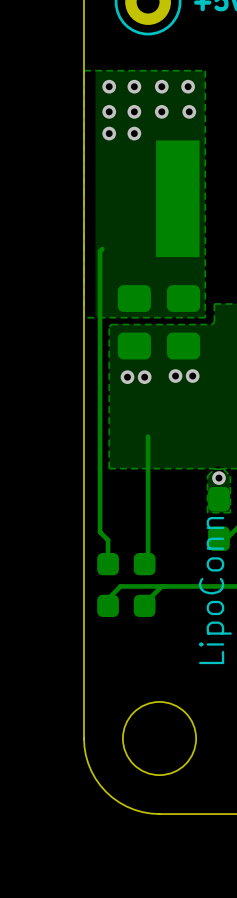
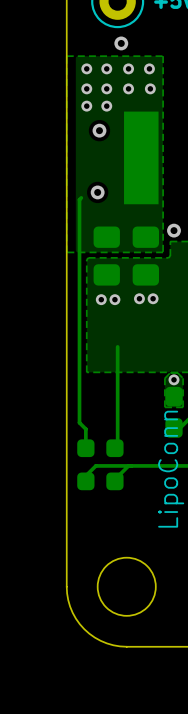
via: none -> (121, 43)
via: none -> (99, 130)
via: none -> (97, 192)
via: none -> (173, 230)

